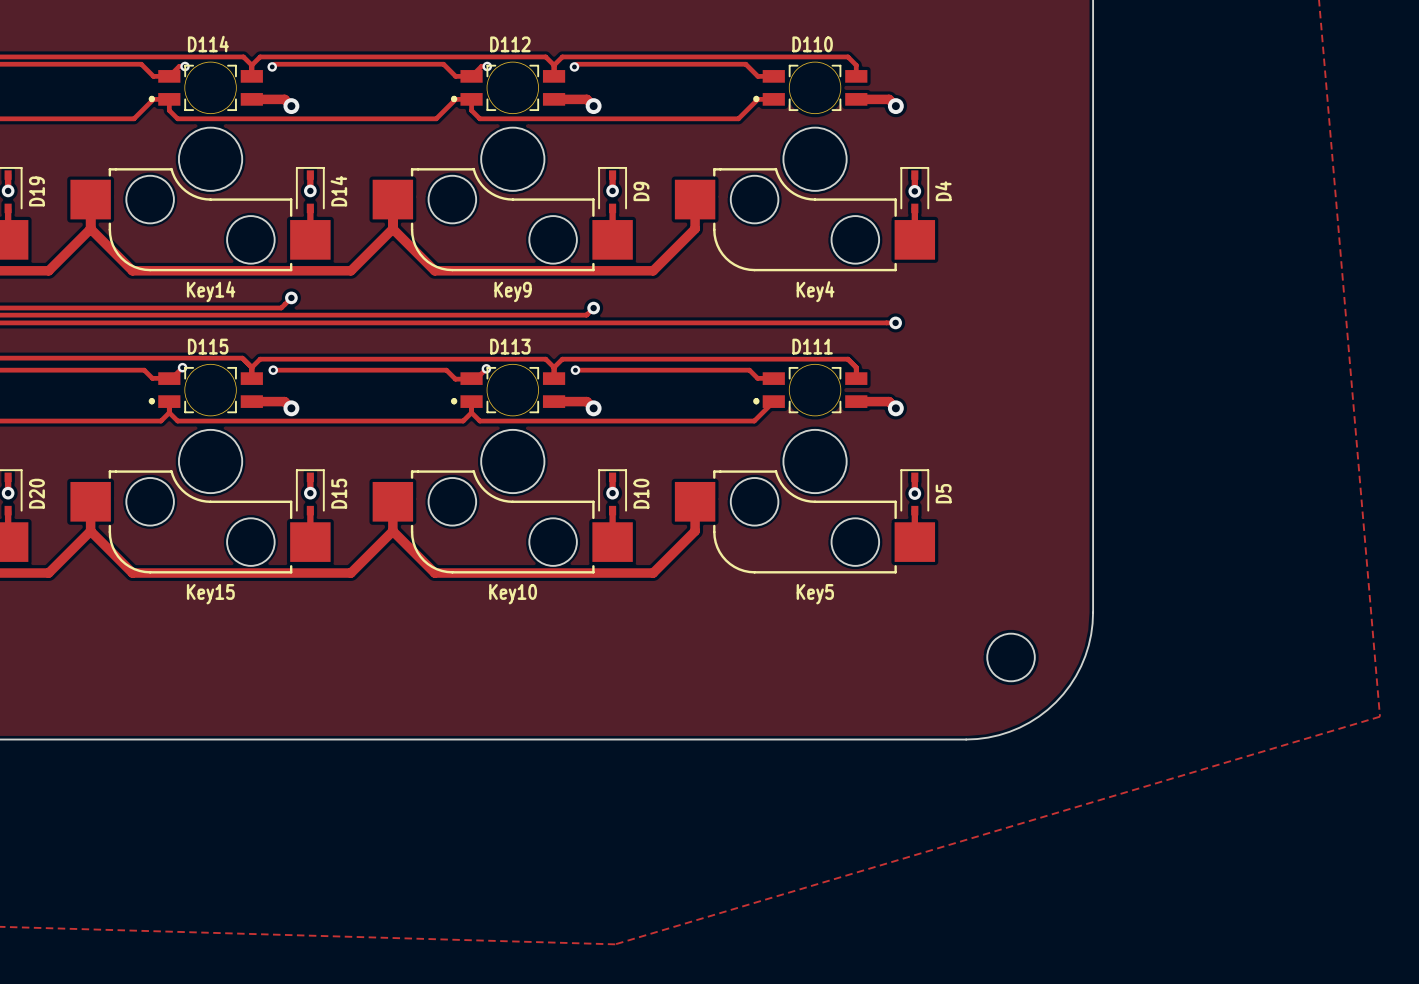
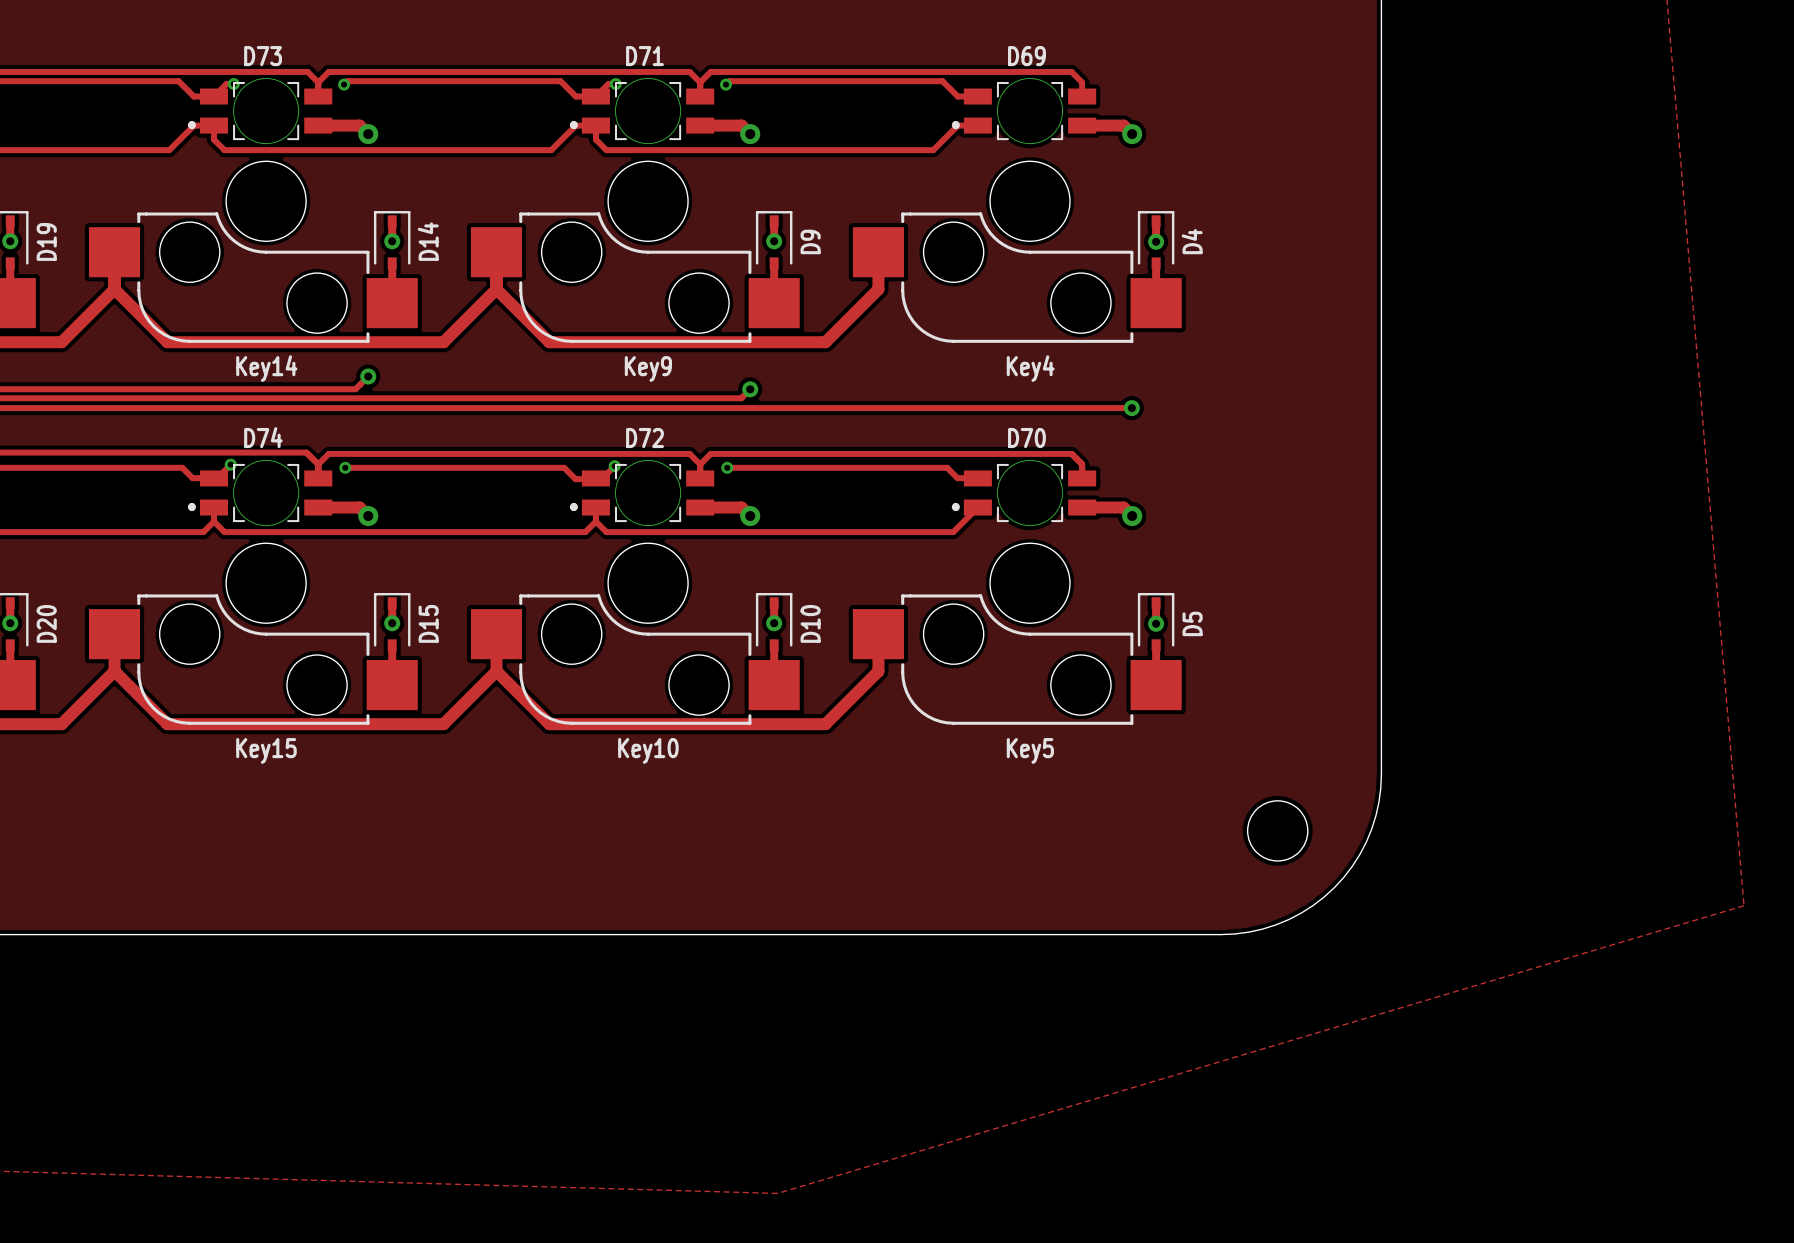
D114 name: D114 (208, 44) -> D73 (263, 56)
D112 name: D112 (510, 44) -> D71 (645, 56)
D110 name: D110 (812, 44) -> D69 (1026, 56)
D115 name: D115 (208, 346) -> D74 (263, 437)
D113 name: D113 (510, 346) -> D72 (645, 438)
D111 name: D111 (812, 346) -> D70 (1026, 438)

